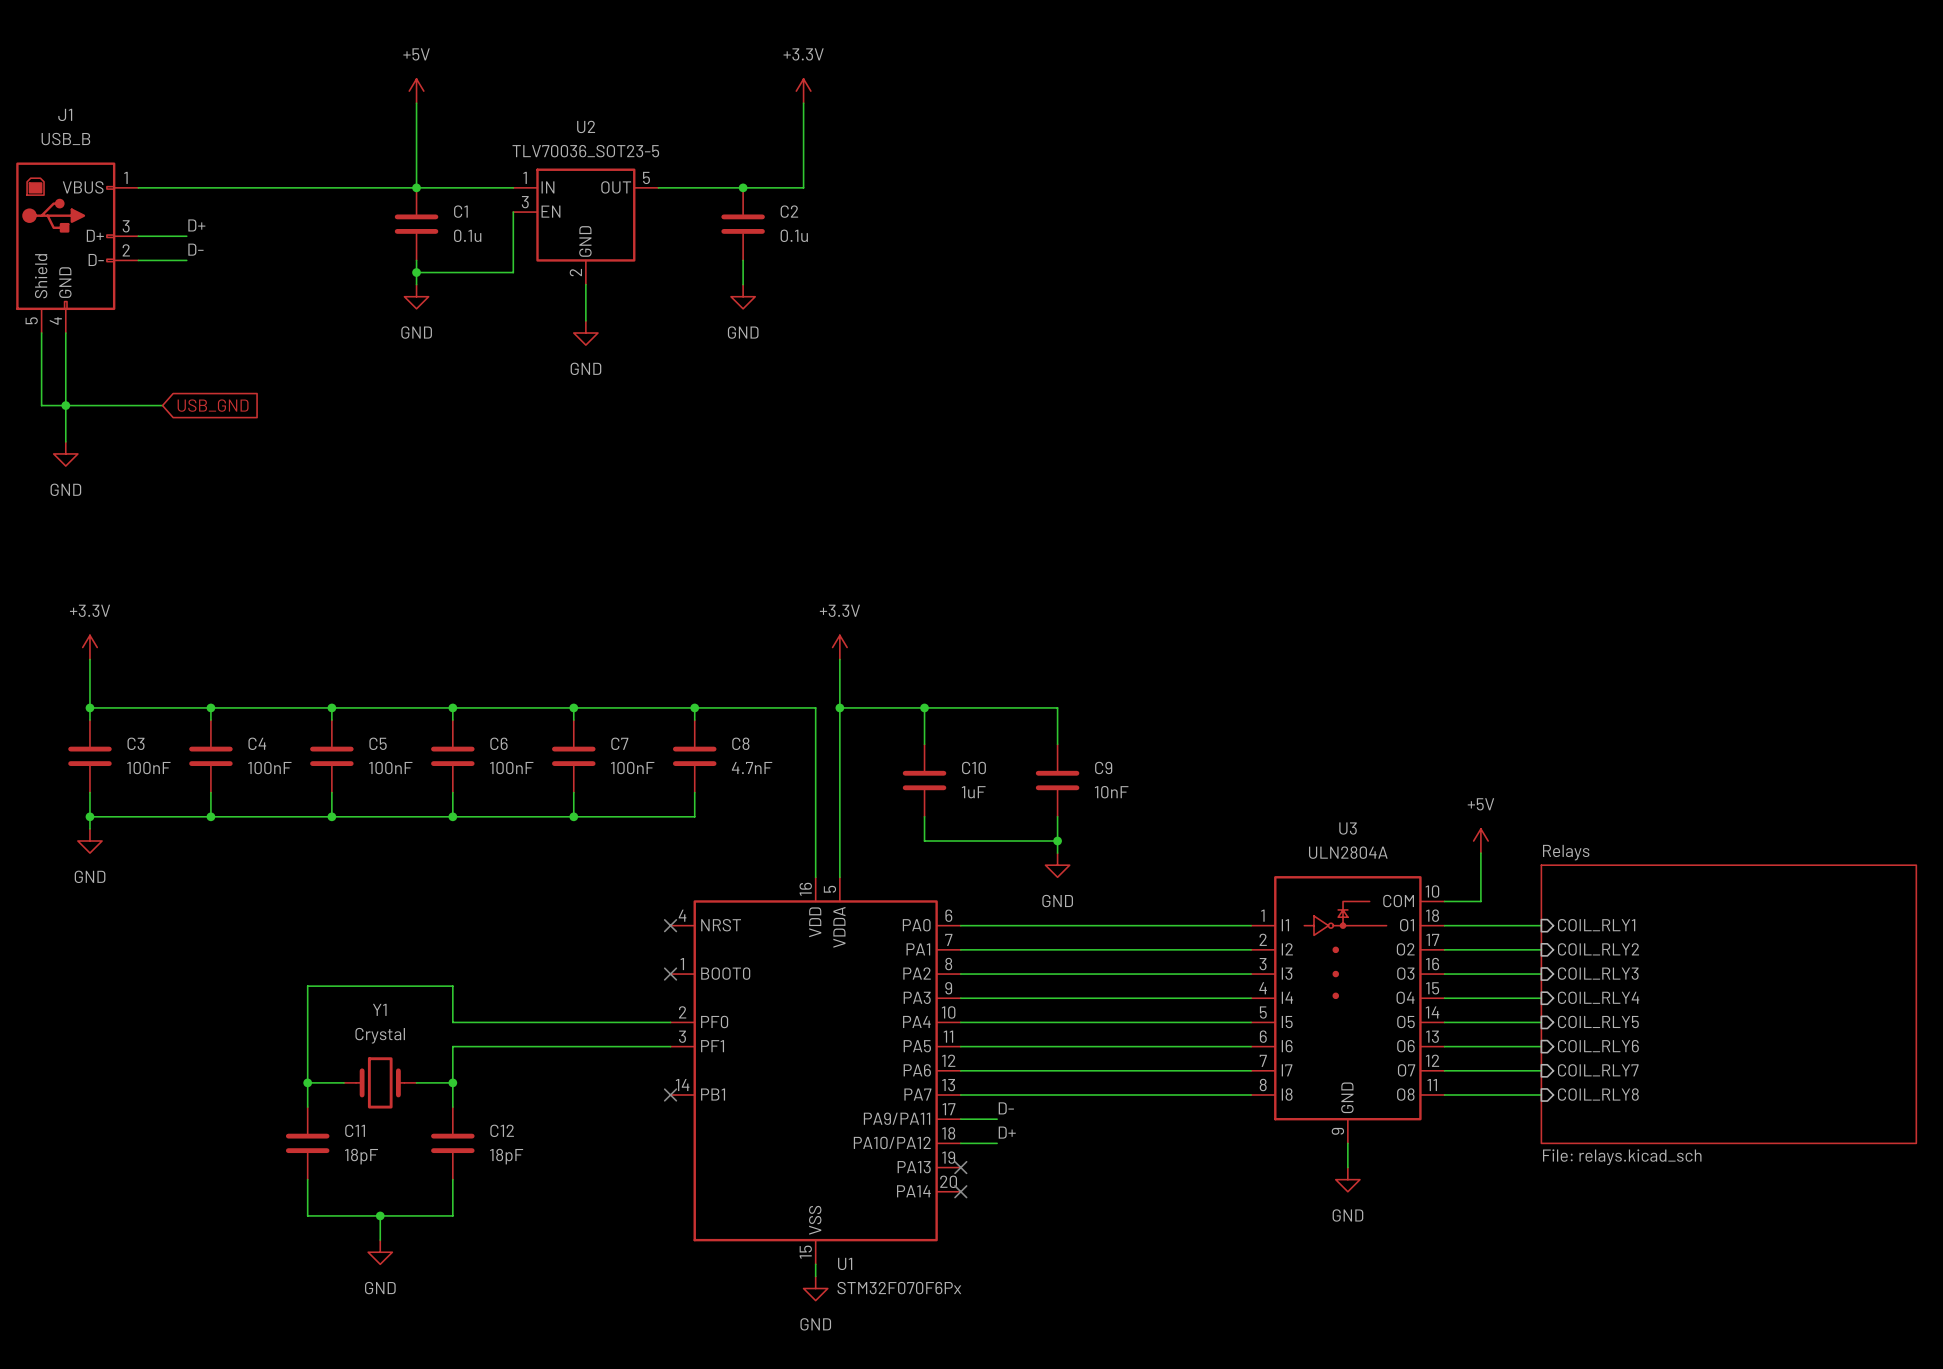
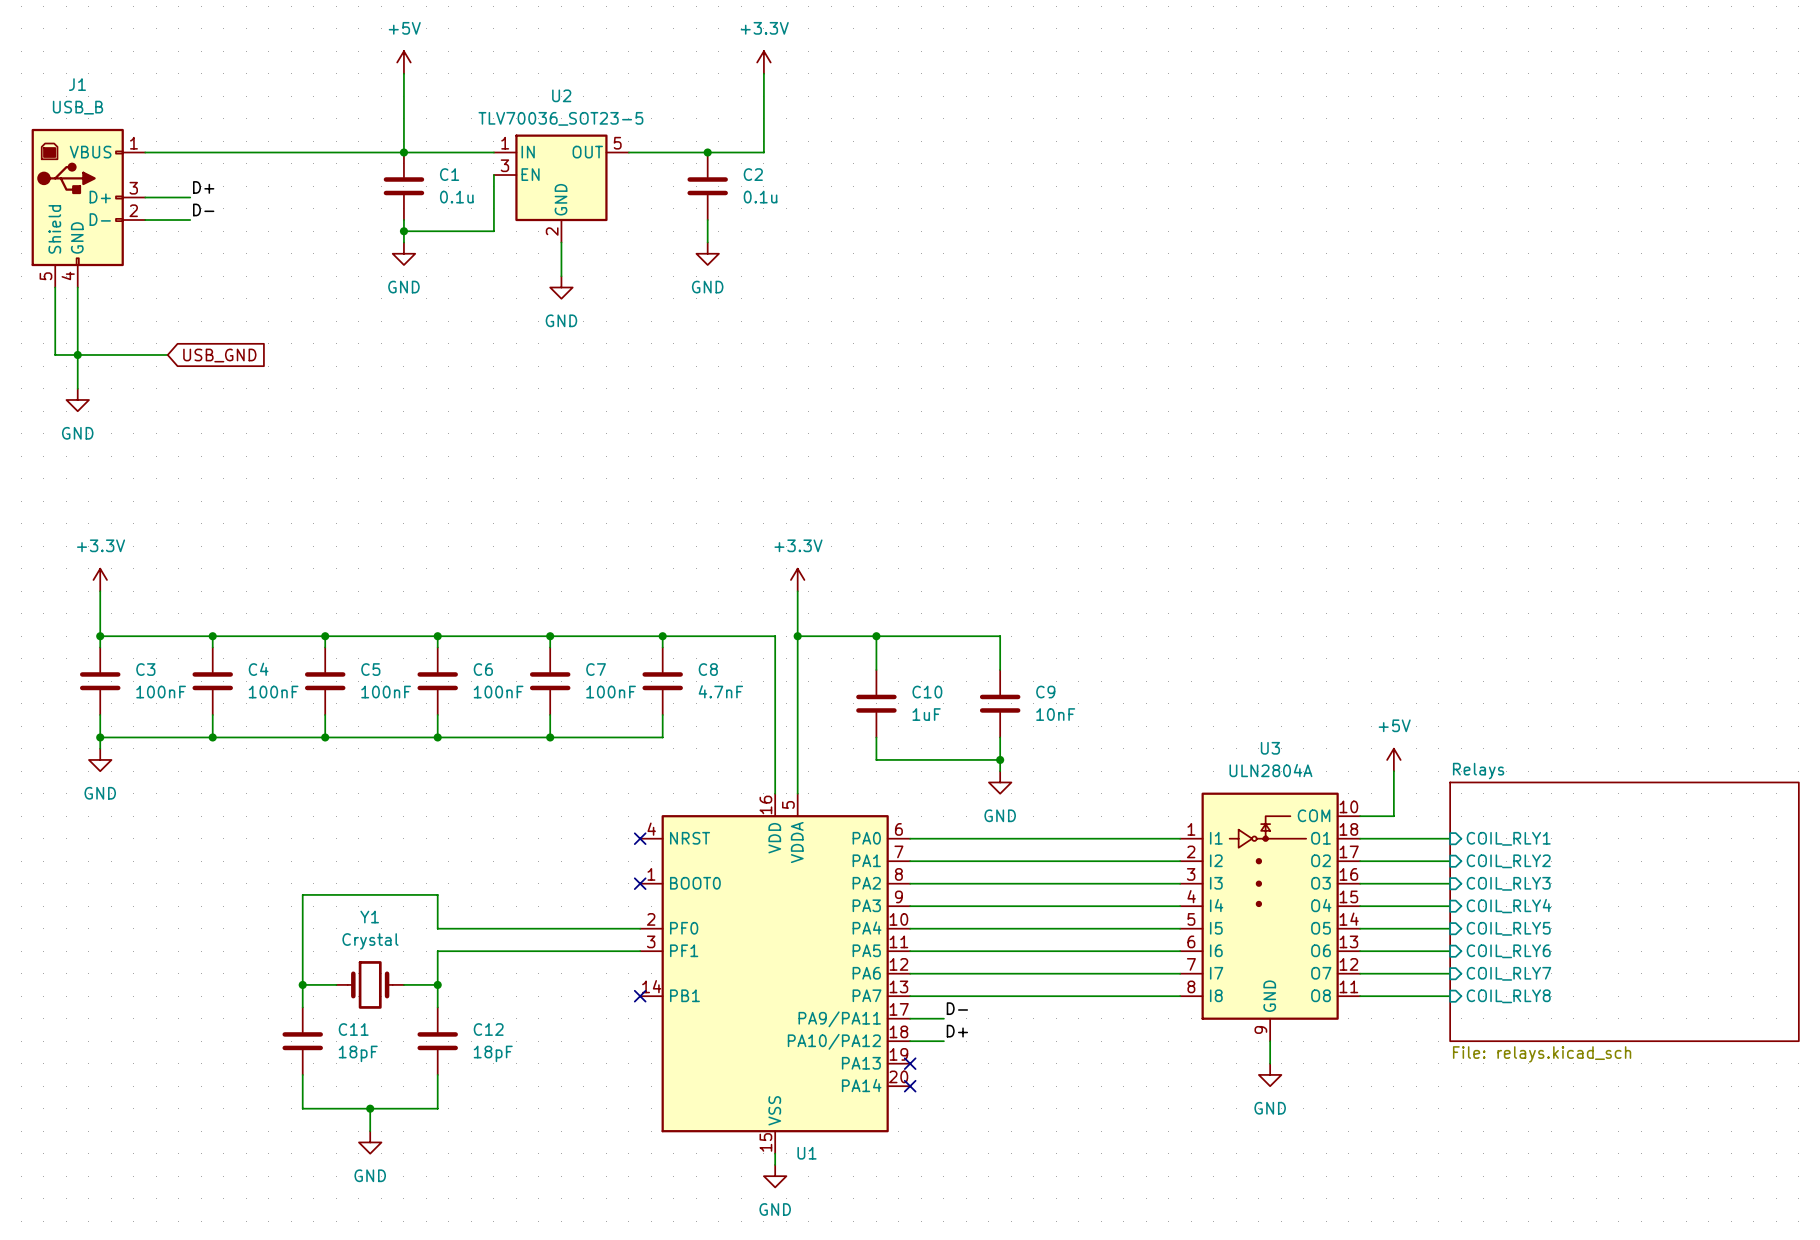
U1 value: STM32F070F6Px (899, 1288) -> none

